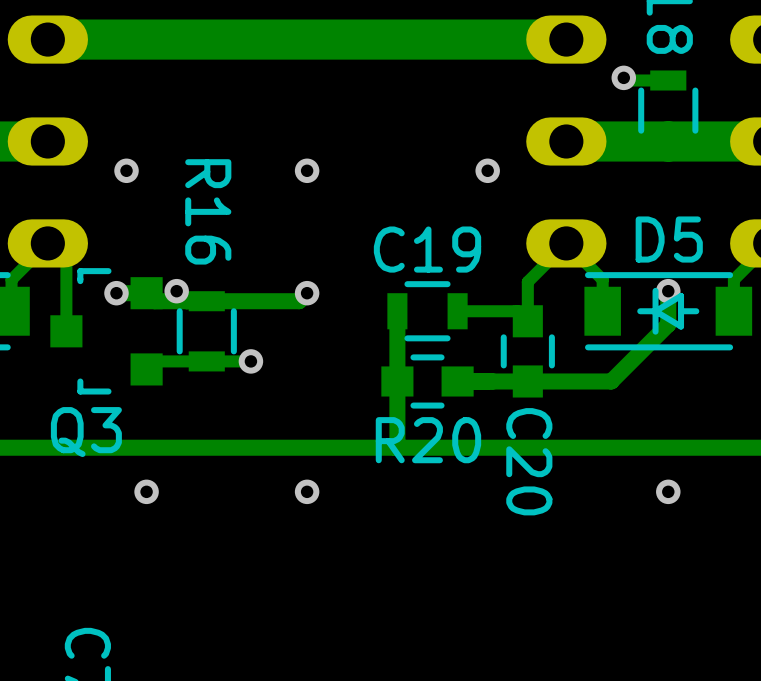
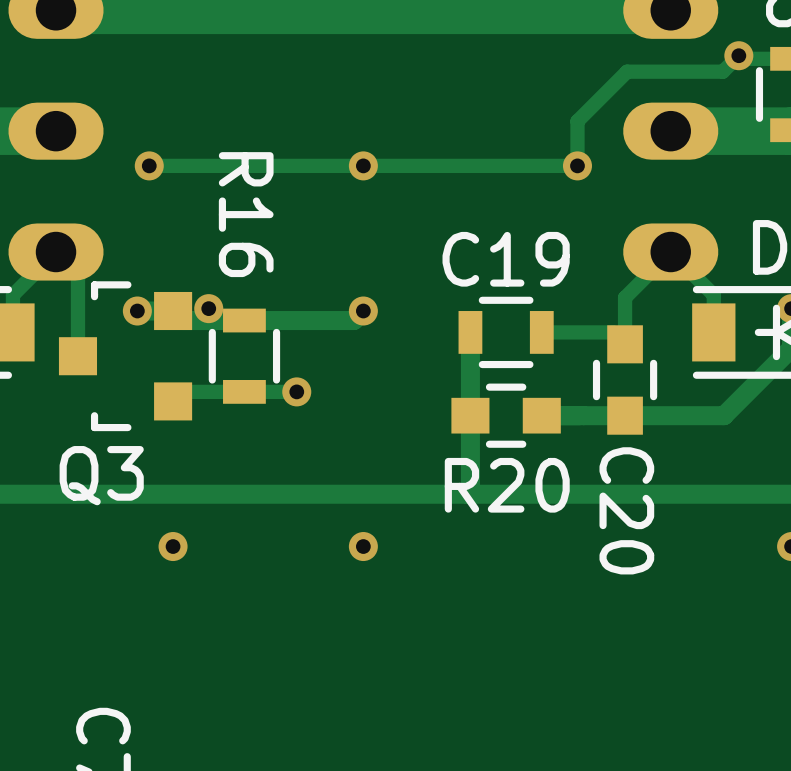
track: none -> (742, 58) (739, 55) (722, 71) (627, 71) (577, 121) (577, 165) (149, 165)

